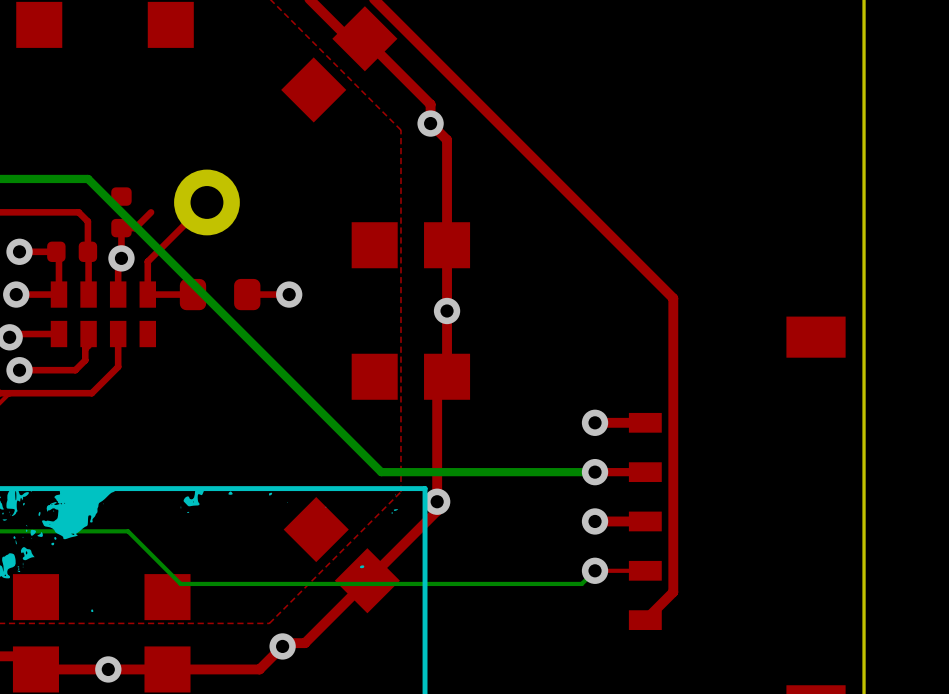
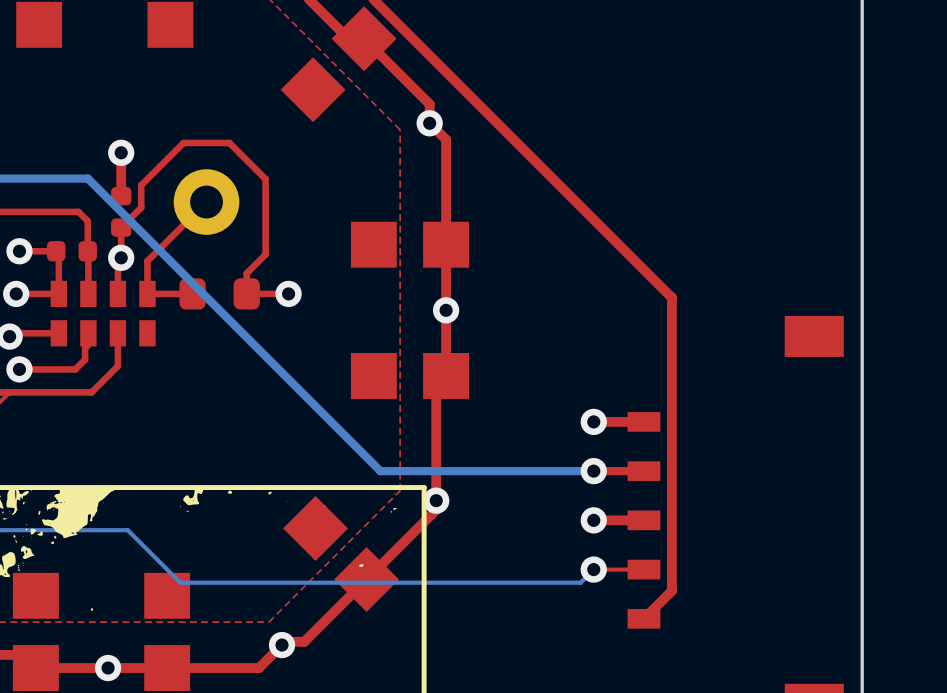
top track: none -> (121, 152) (121, 196)
via: none -> (121, 152)
top track: (151, 212) (135, 228) (121, 228) -> (249, 291) (246, 293) (246, 273) (265, 254) (265, 179) (229, 142) (183, 142) (141, 185) (141, 207) (121, 227)

